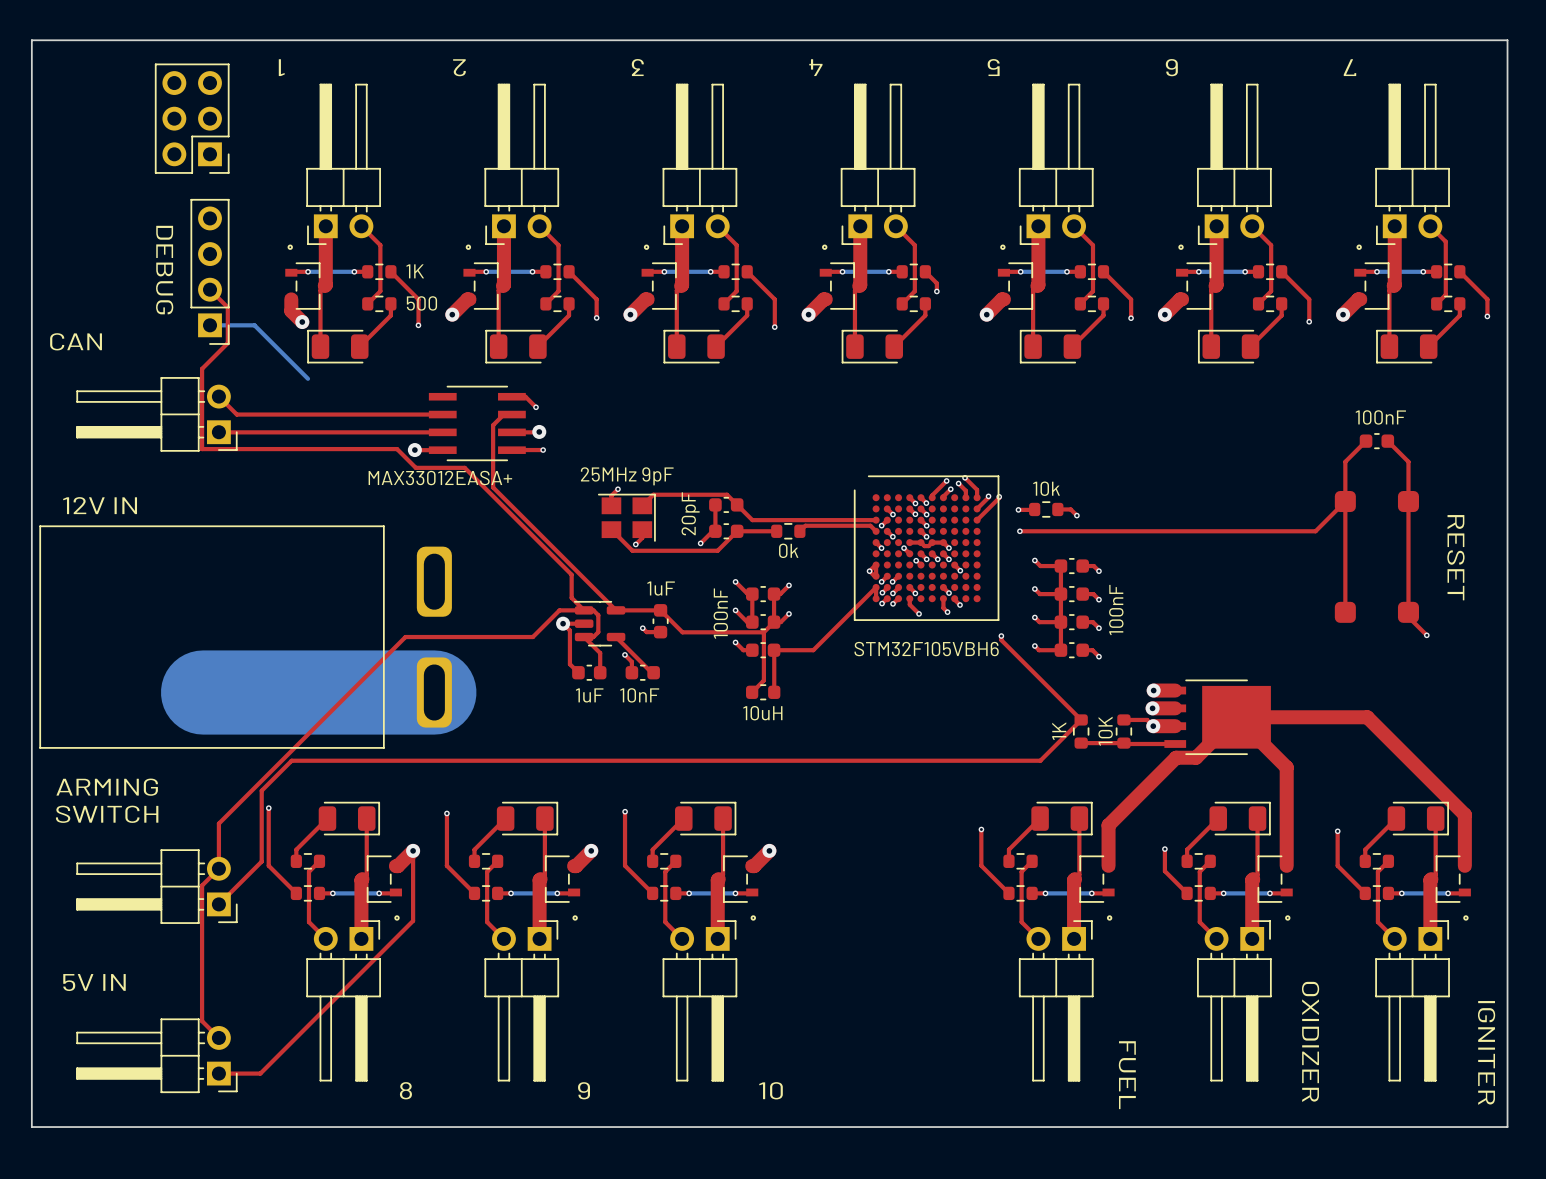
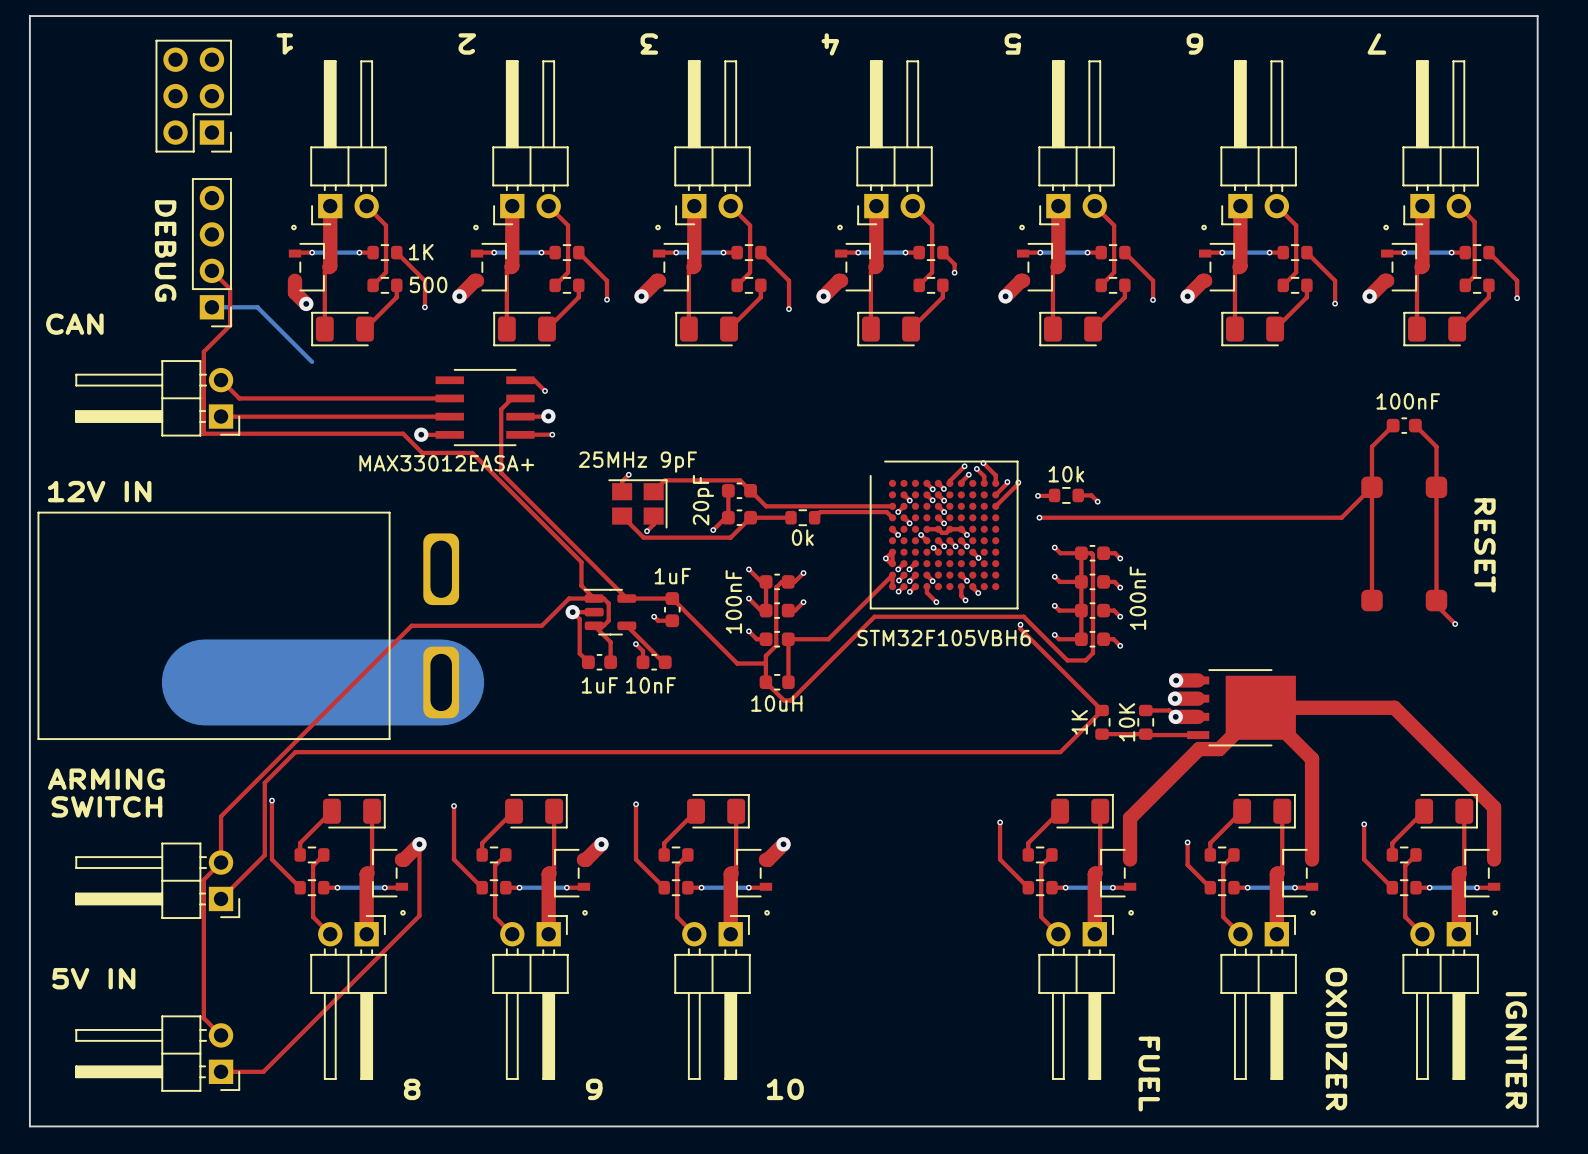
top track: (774, 594) (774, 622) (763, 632) -> (788, 581) (781, 581) (776, 587) (776, 645) (765, 655) (765, 682) (784, 700) (790, 700) (874, 616) (1023, 616) (1067, 660) (1085, 660) (1092, 653) (1092, 554) (1081, 553)
top track: (682, 632) (763, 632) -> (694, 620) (737, 663) (765, 663)
top track: (763, 632) (763, 680) (752, 692) -> none

